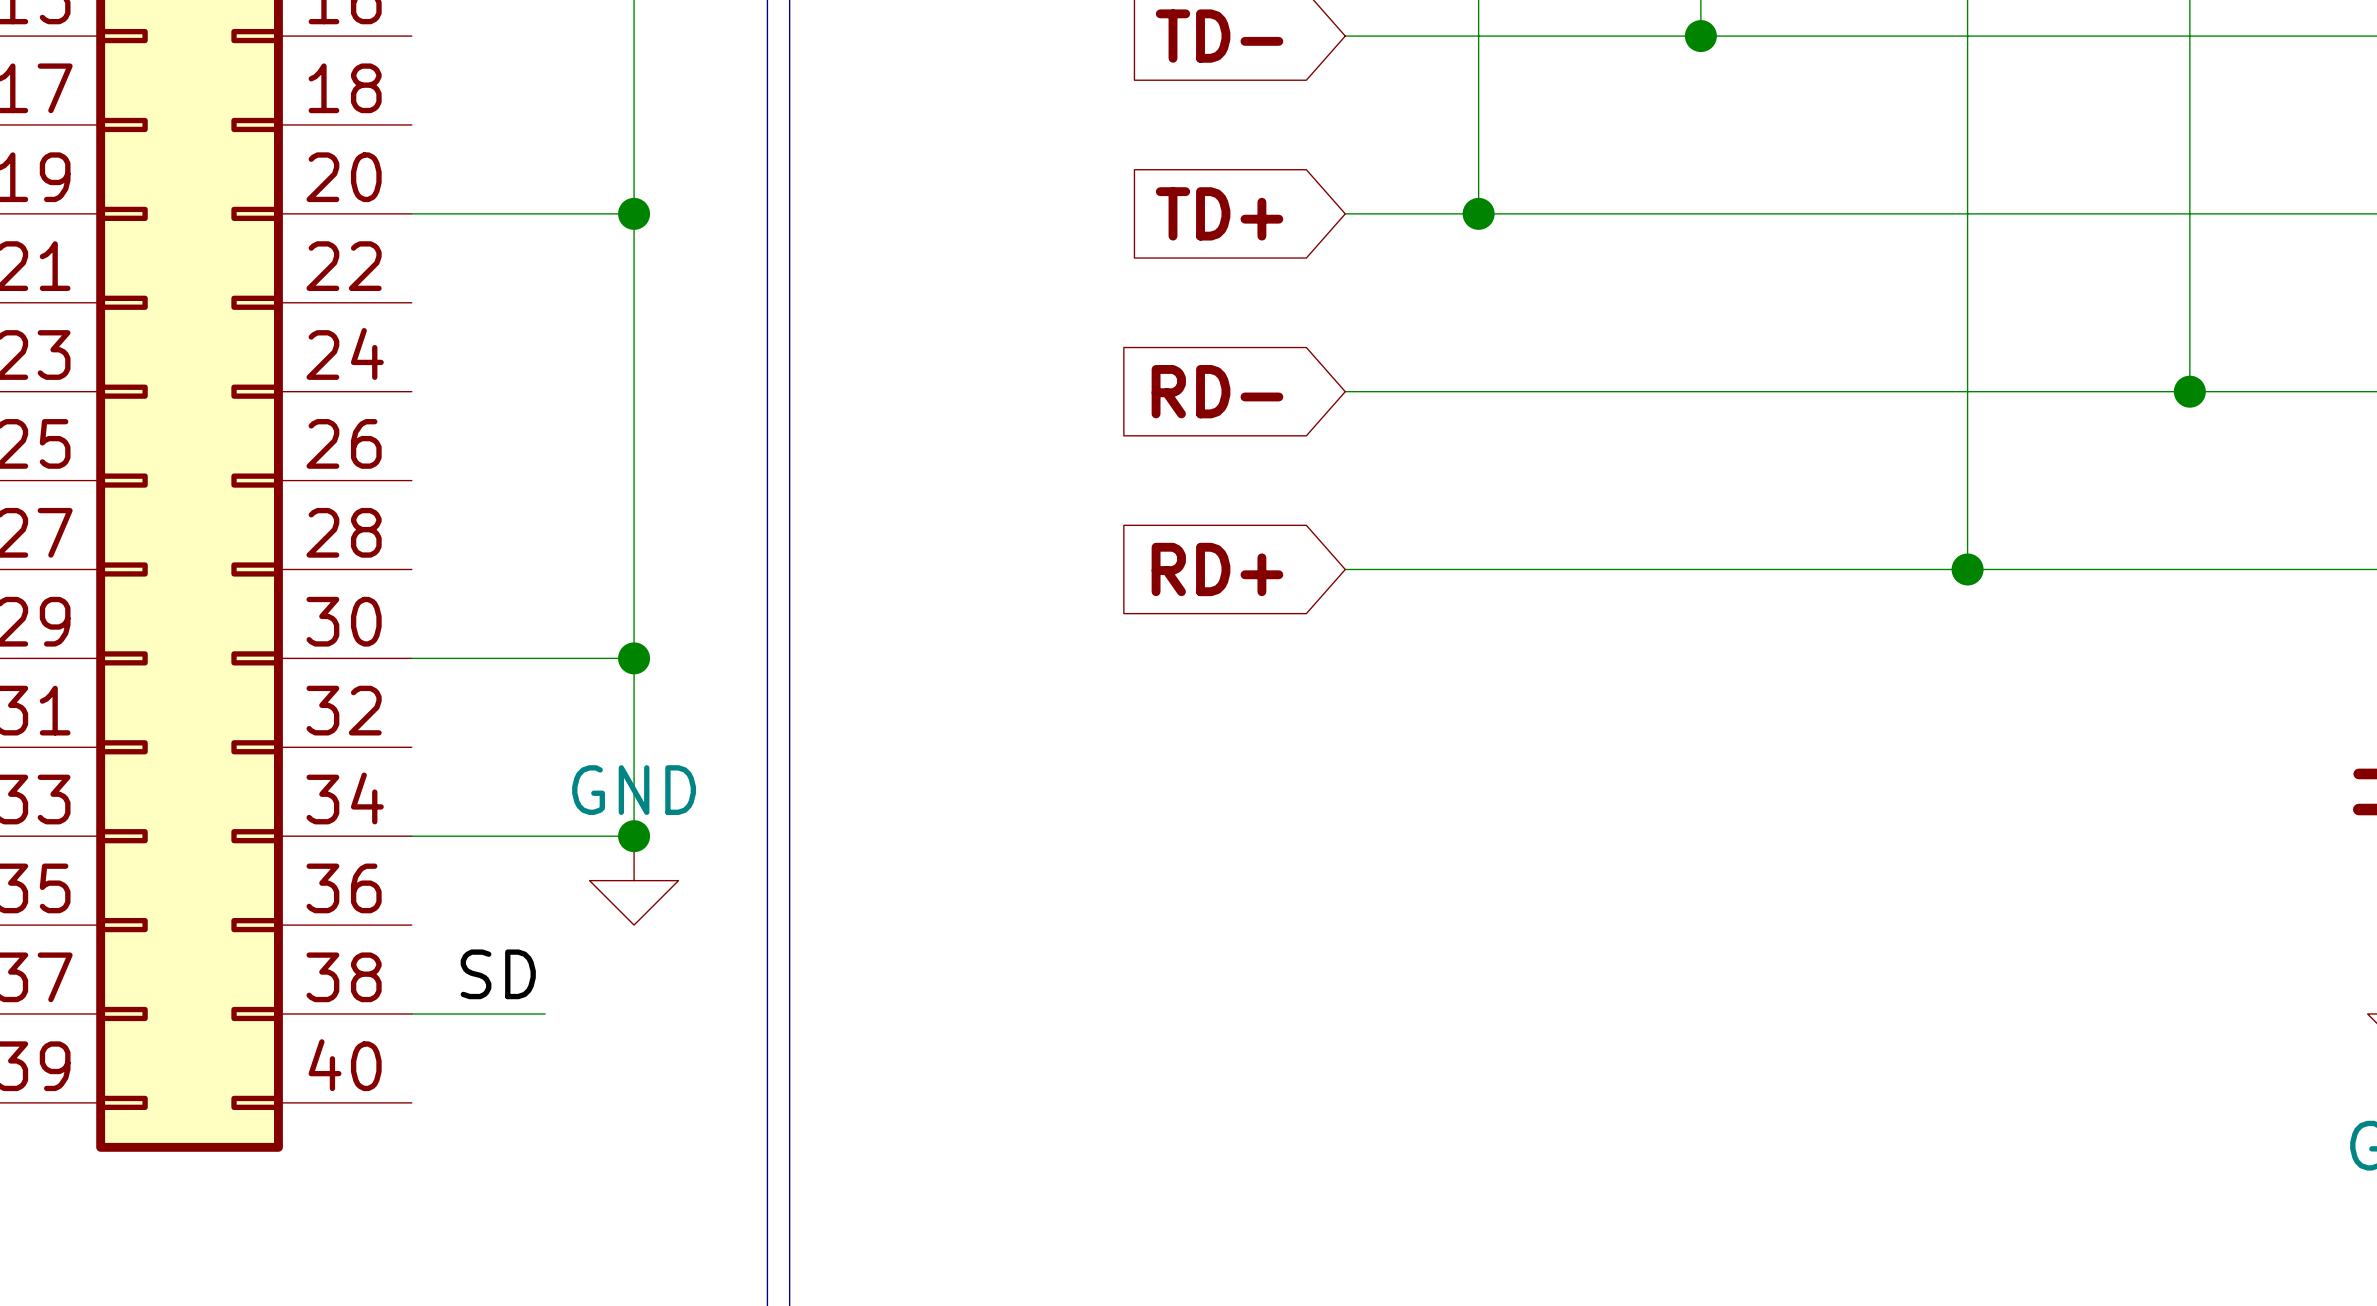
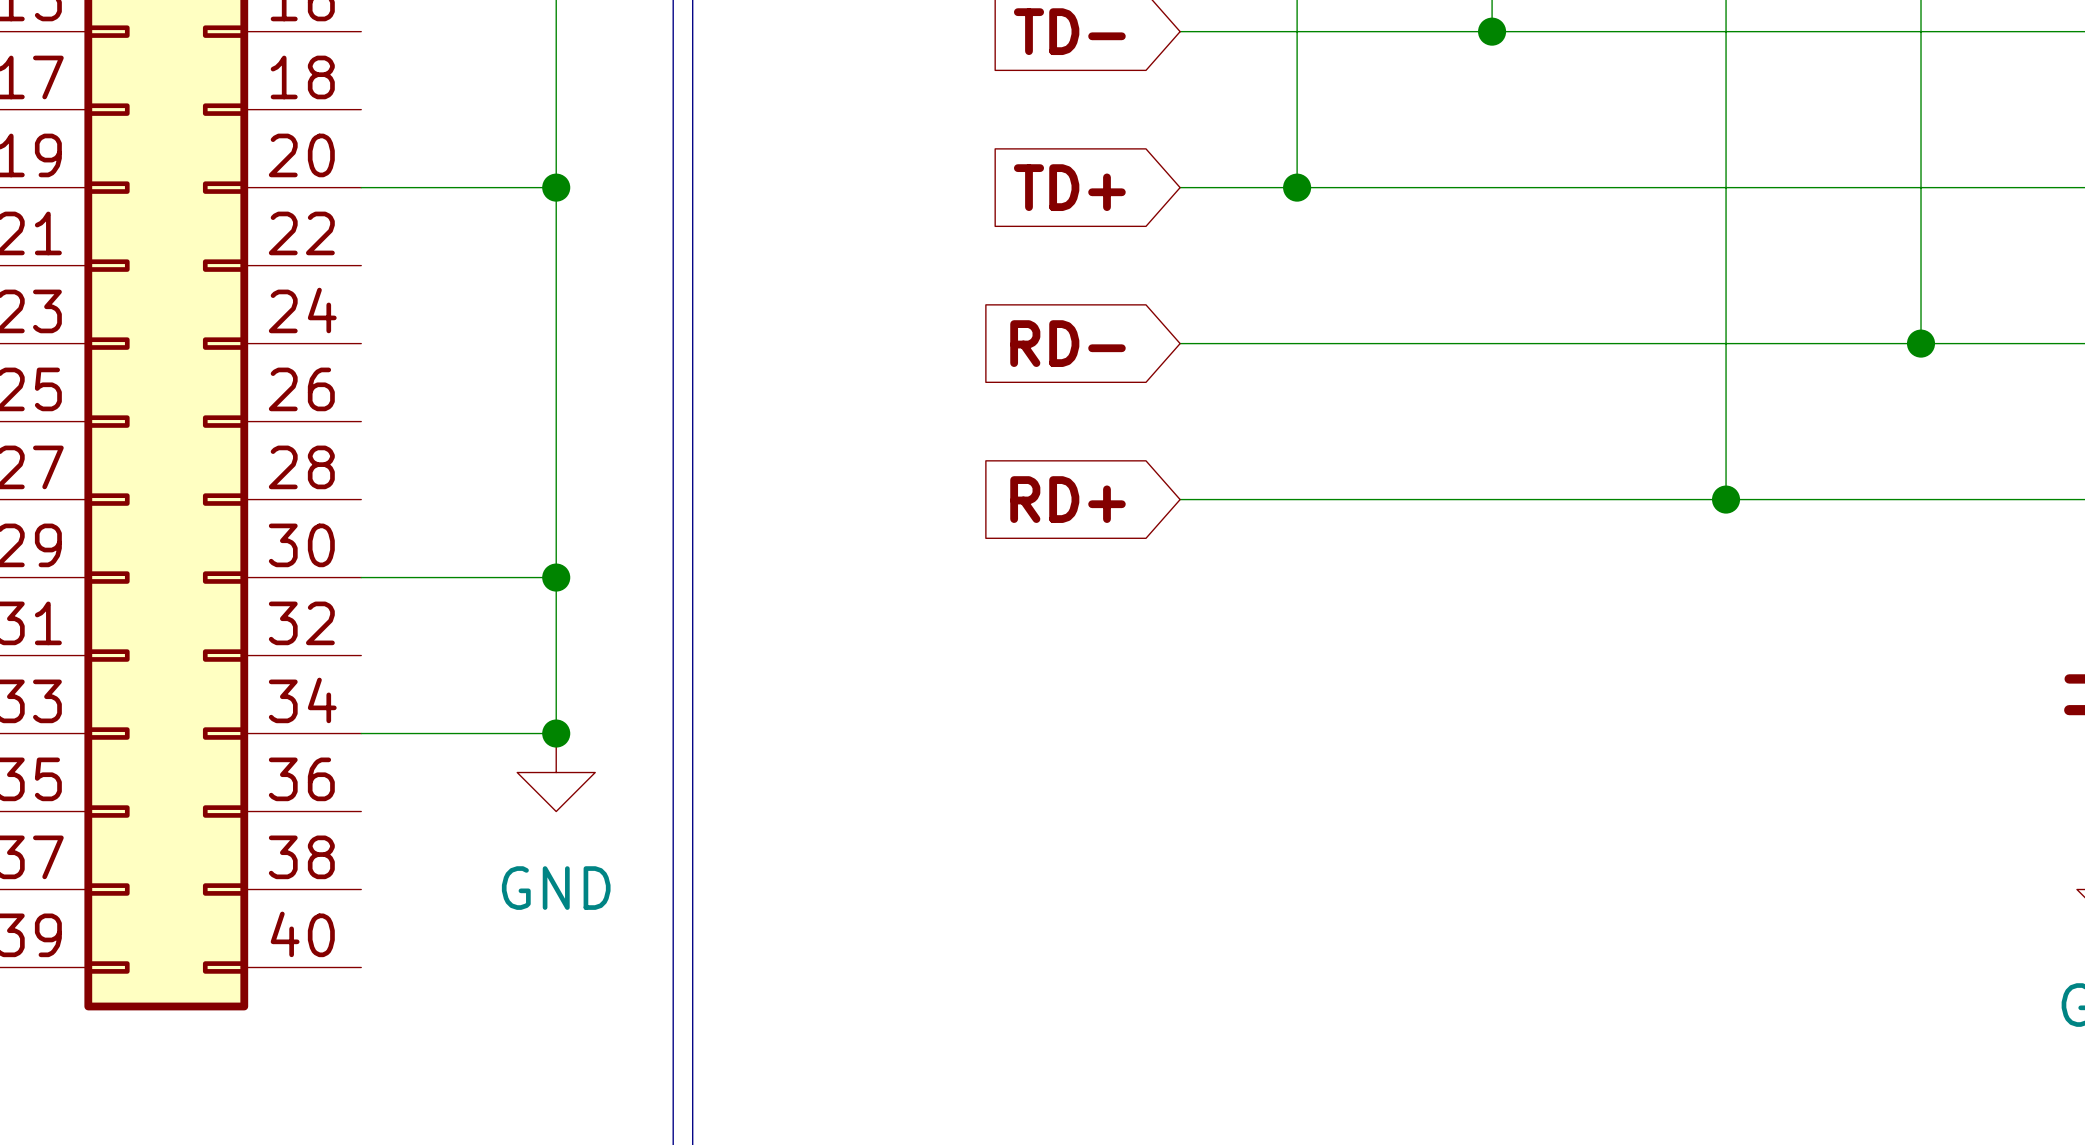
power symbol text position: GND (634, 790) -> GND (556, 888)
label: SD (498, 974) -> none
wire: (411, 1013) (545, 1013) -> none

